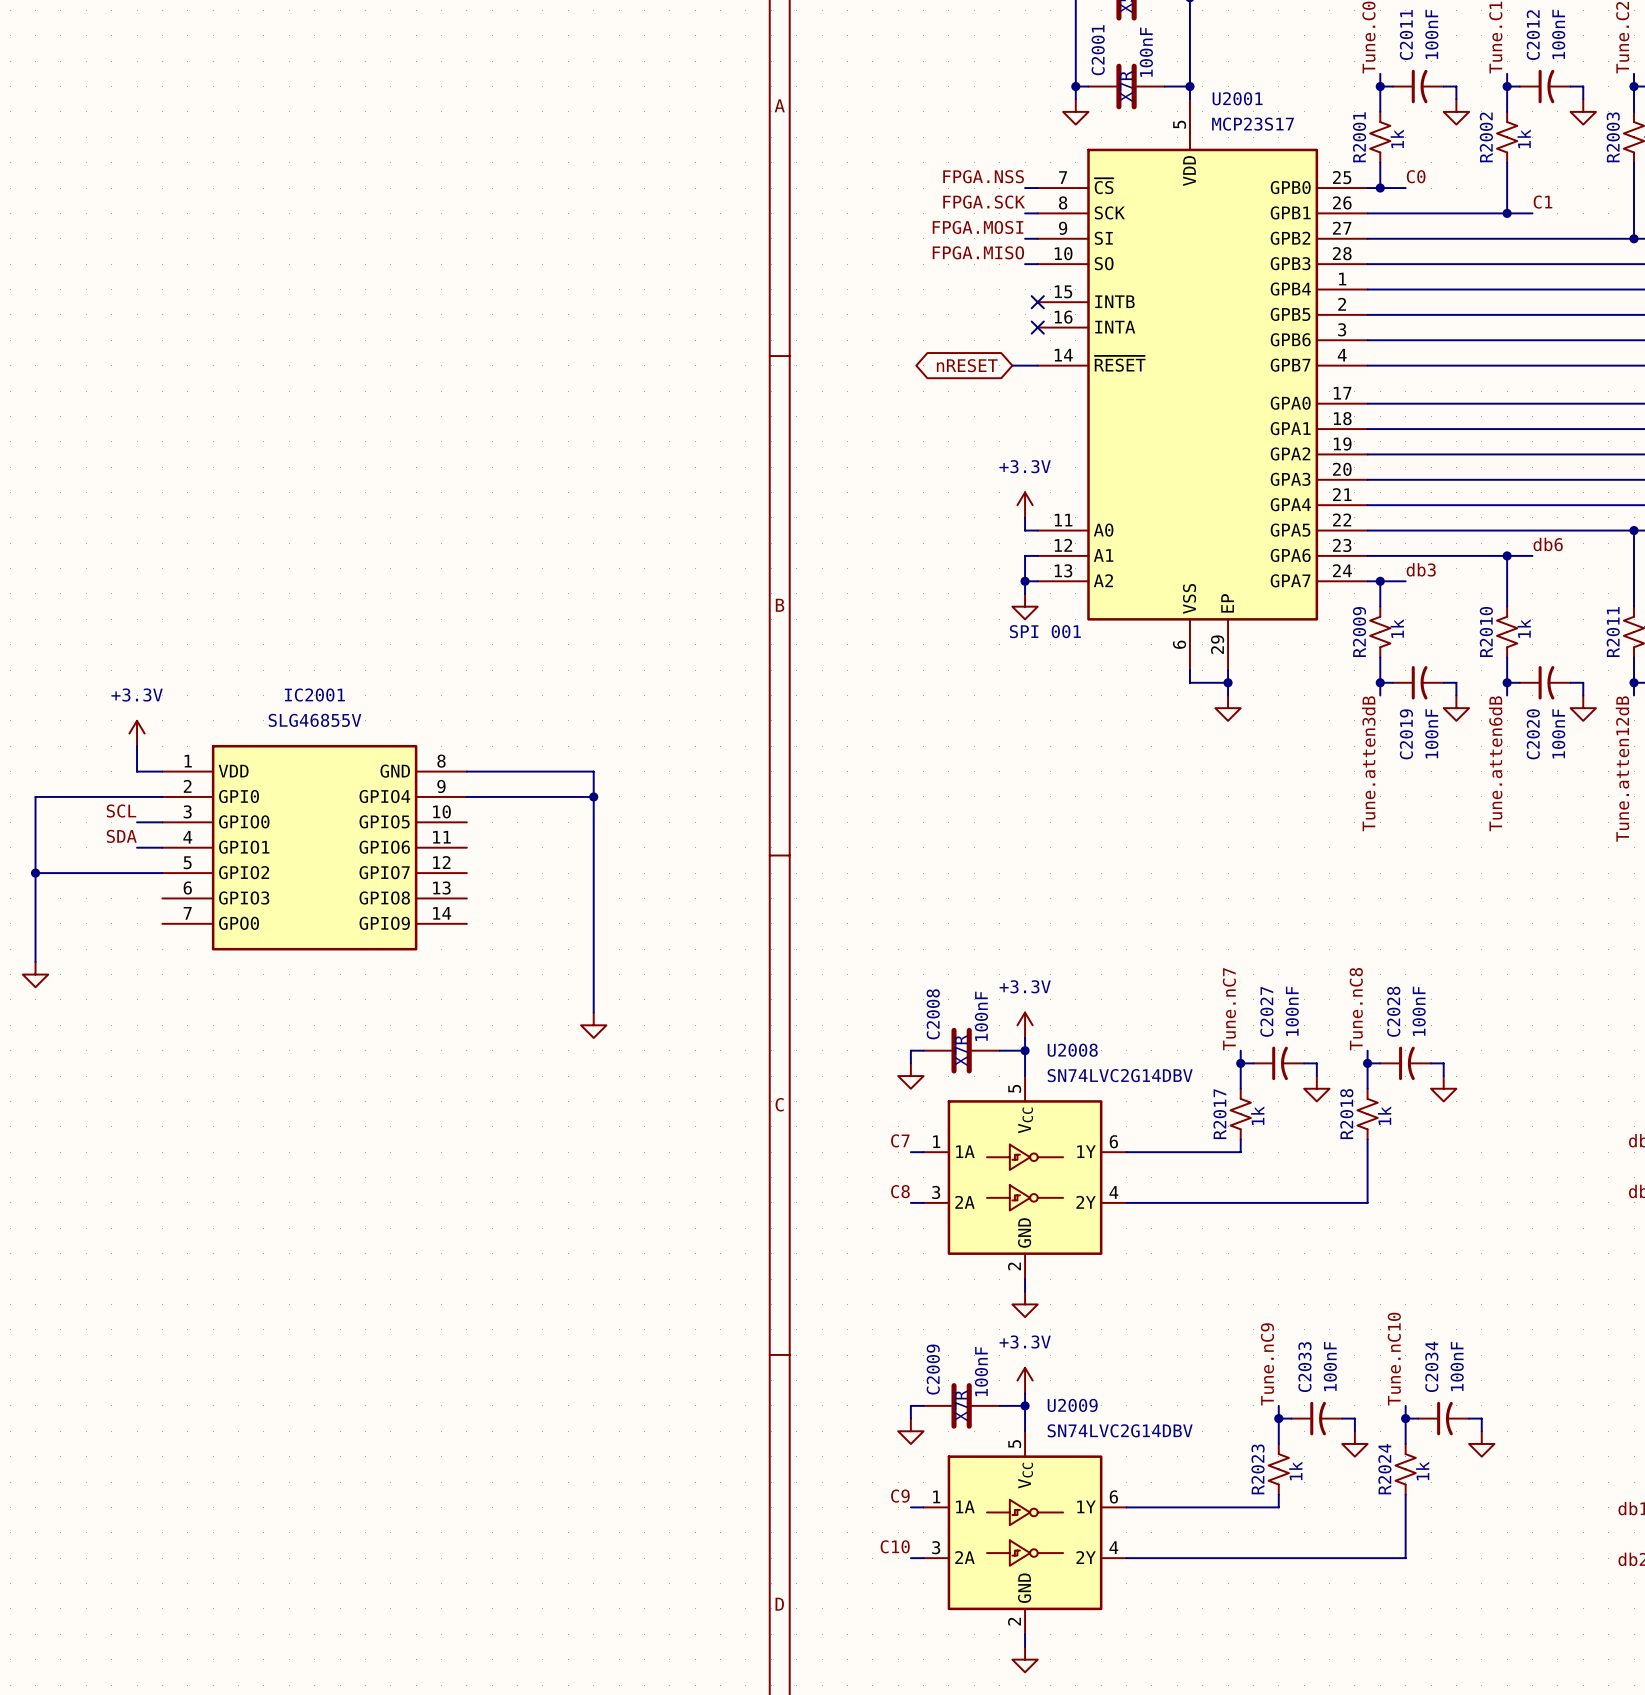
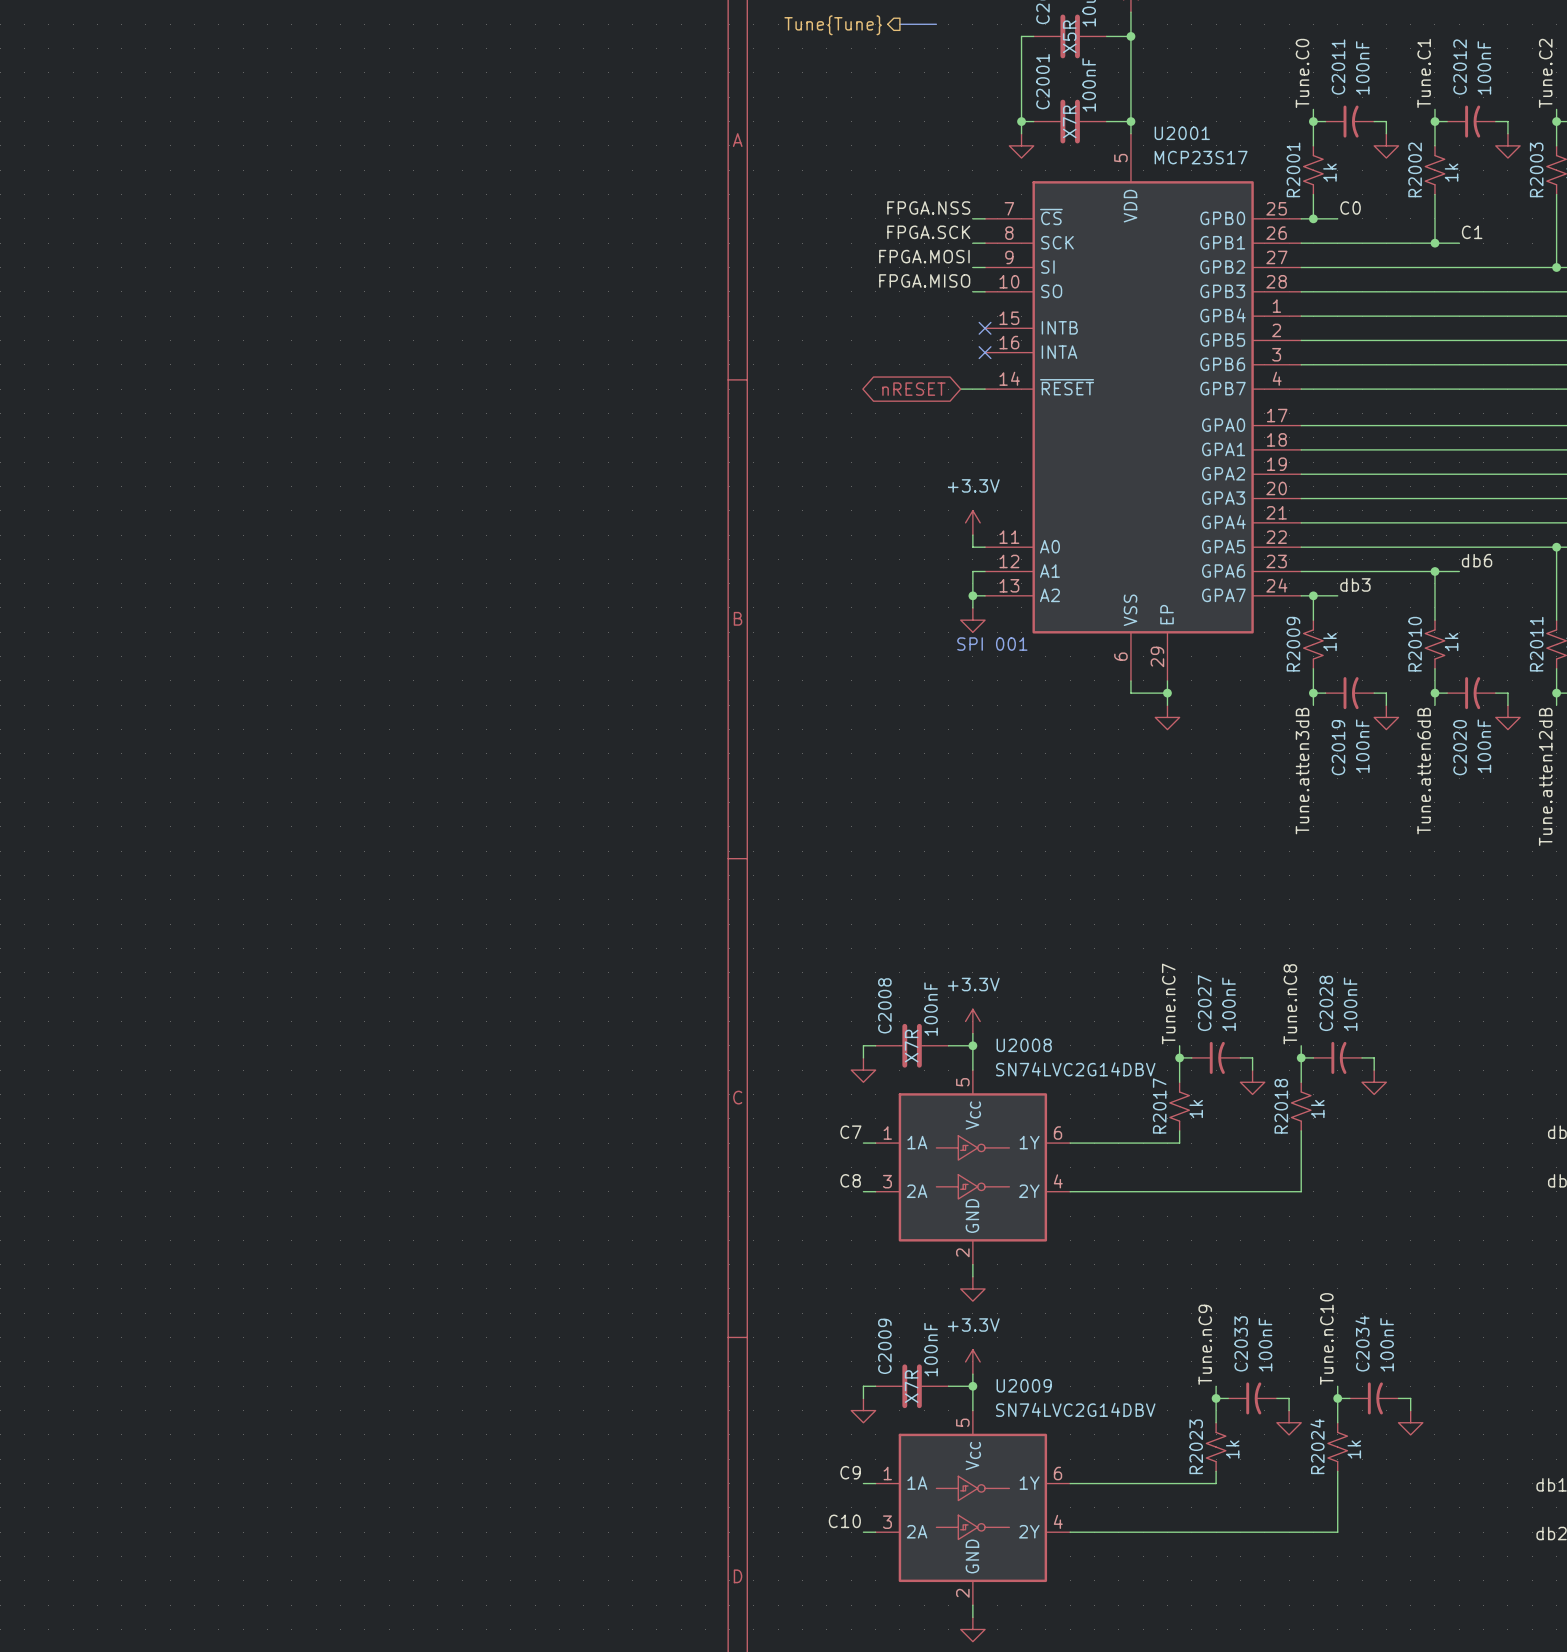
power symbol: +3.3V (137, 733) -> none
wire: (137, 746) (137, 771) (162, 771) -> none
wire: (466, 771) (593, 771) (593, 1012) -> none
wire: (162, 796) (35, 796) (35, 961) -> none
wire: (466, 796) (593, 796) -> none
junction: (593, 796) -> none
label: SCL (121, 811) -> none
wire: (137, 822) (162, 822) -> none
label: SDA (121, 836) -> none
wire: (137, 847) (162, 847) -> none
IC2001: SLG46855V (314, 847) -> none
wire: (35, 873) (162, 873) -> none
junction: (35, 873) -> none
power symbol: (35, 974) -> none
power symbol: (593, 1025) -> none

